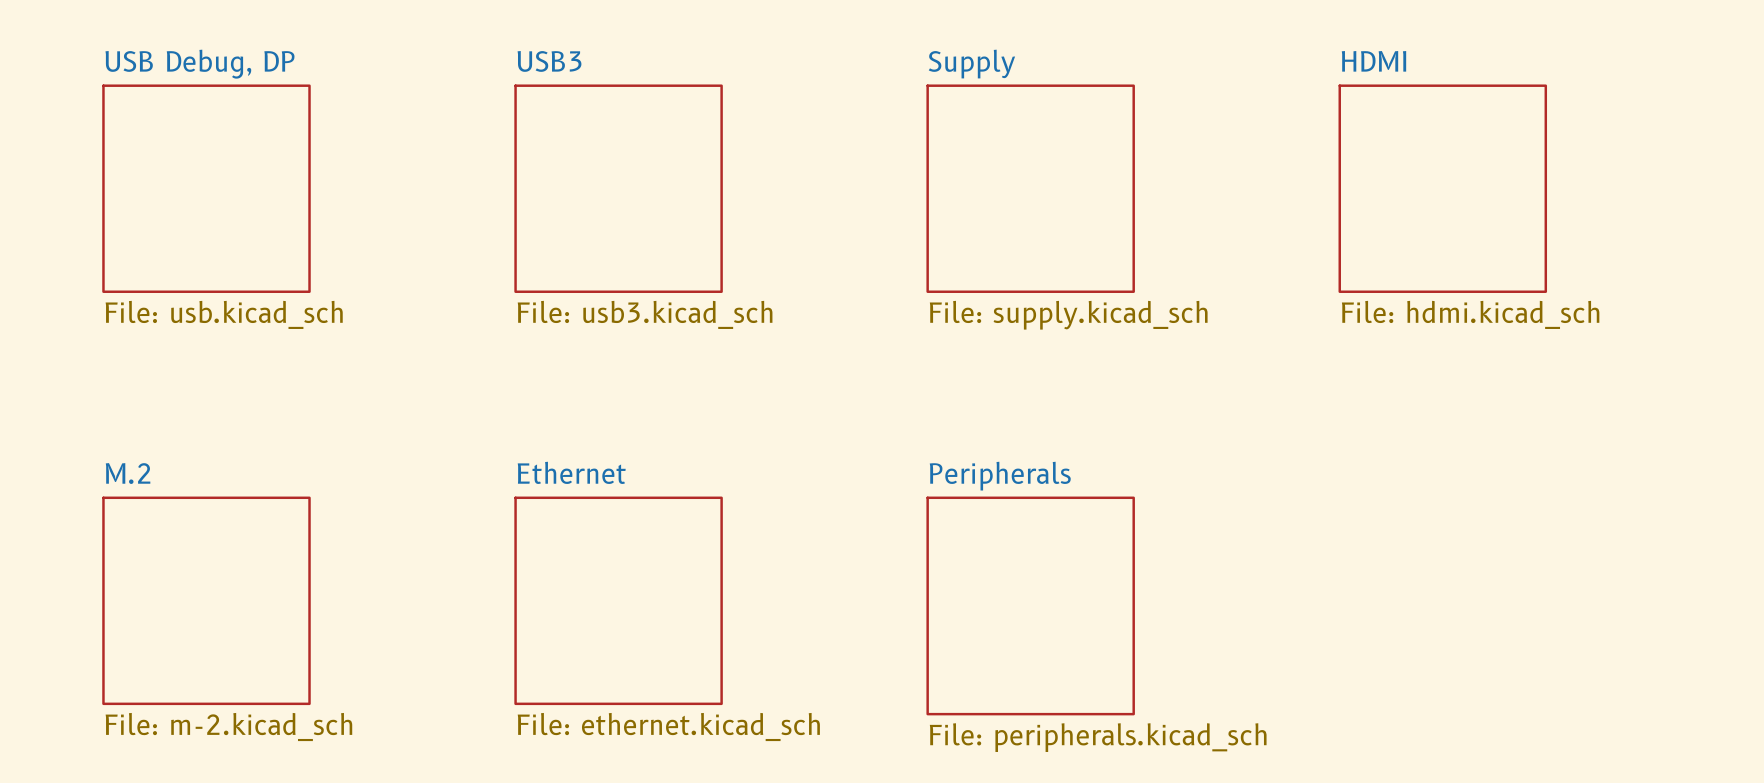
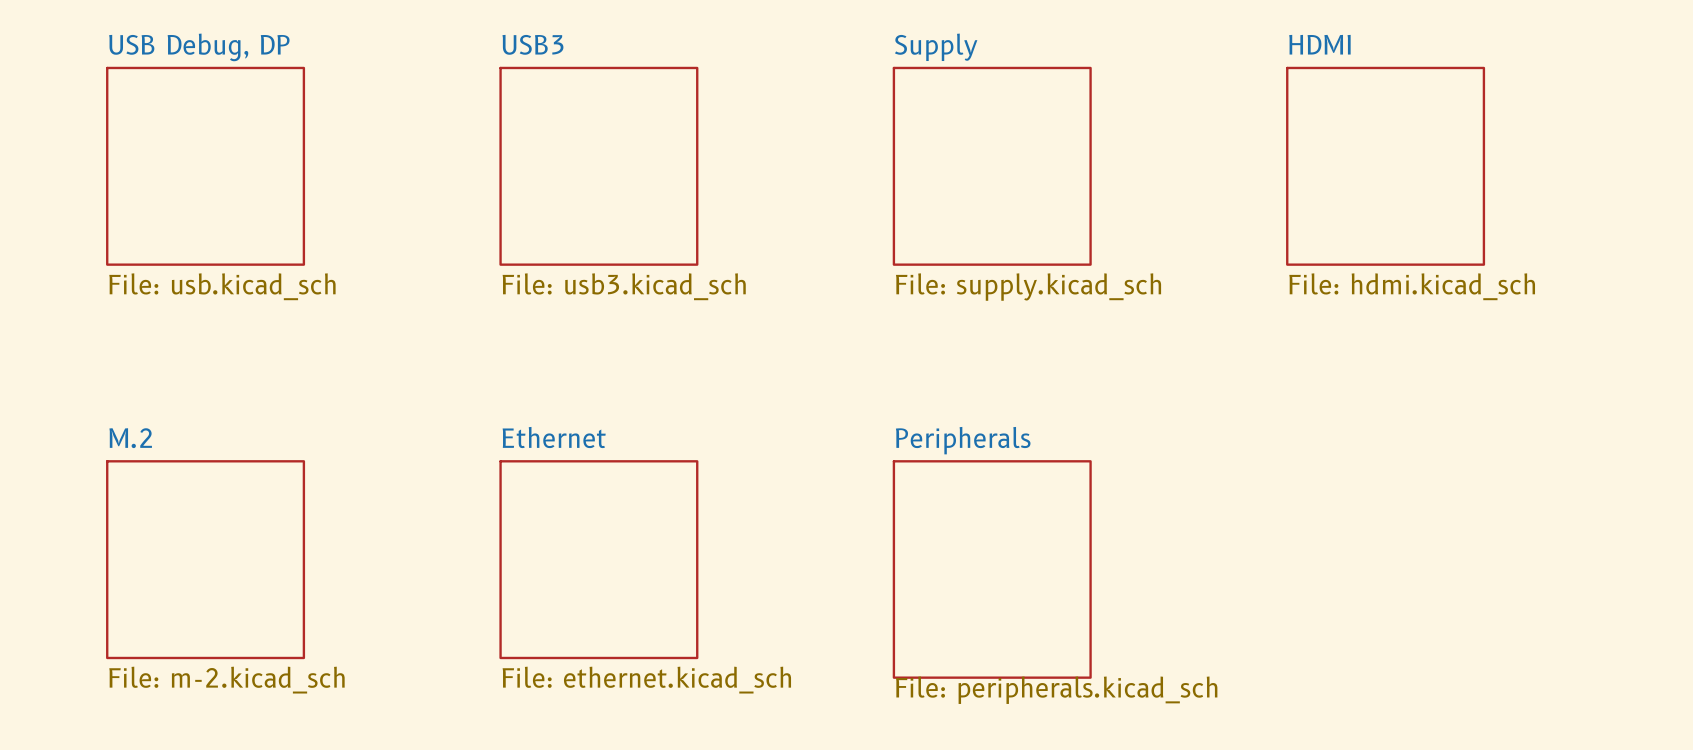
sheet Peripherals shape: [926, 496, 1135, 716] -> [892, 460, 1092, 679]

